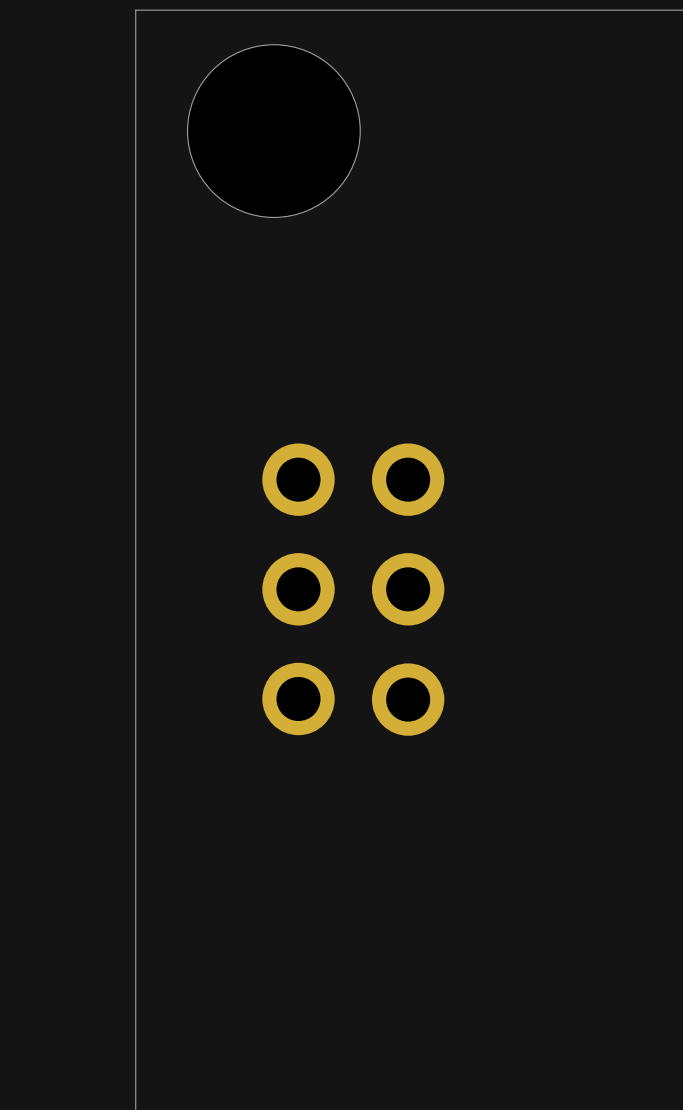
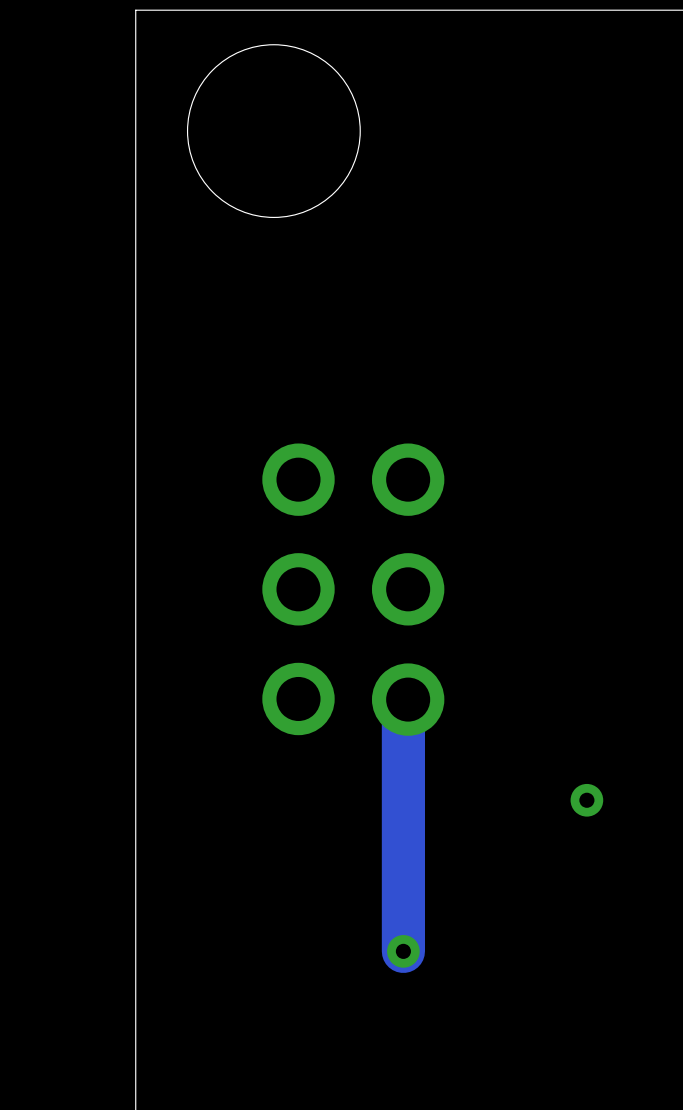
track: none -> (408, 699) (403, 704) (403, 951)
via: none -> (586, 800)
via: none -> (403, 951)

